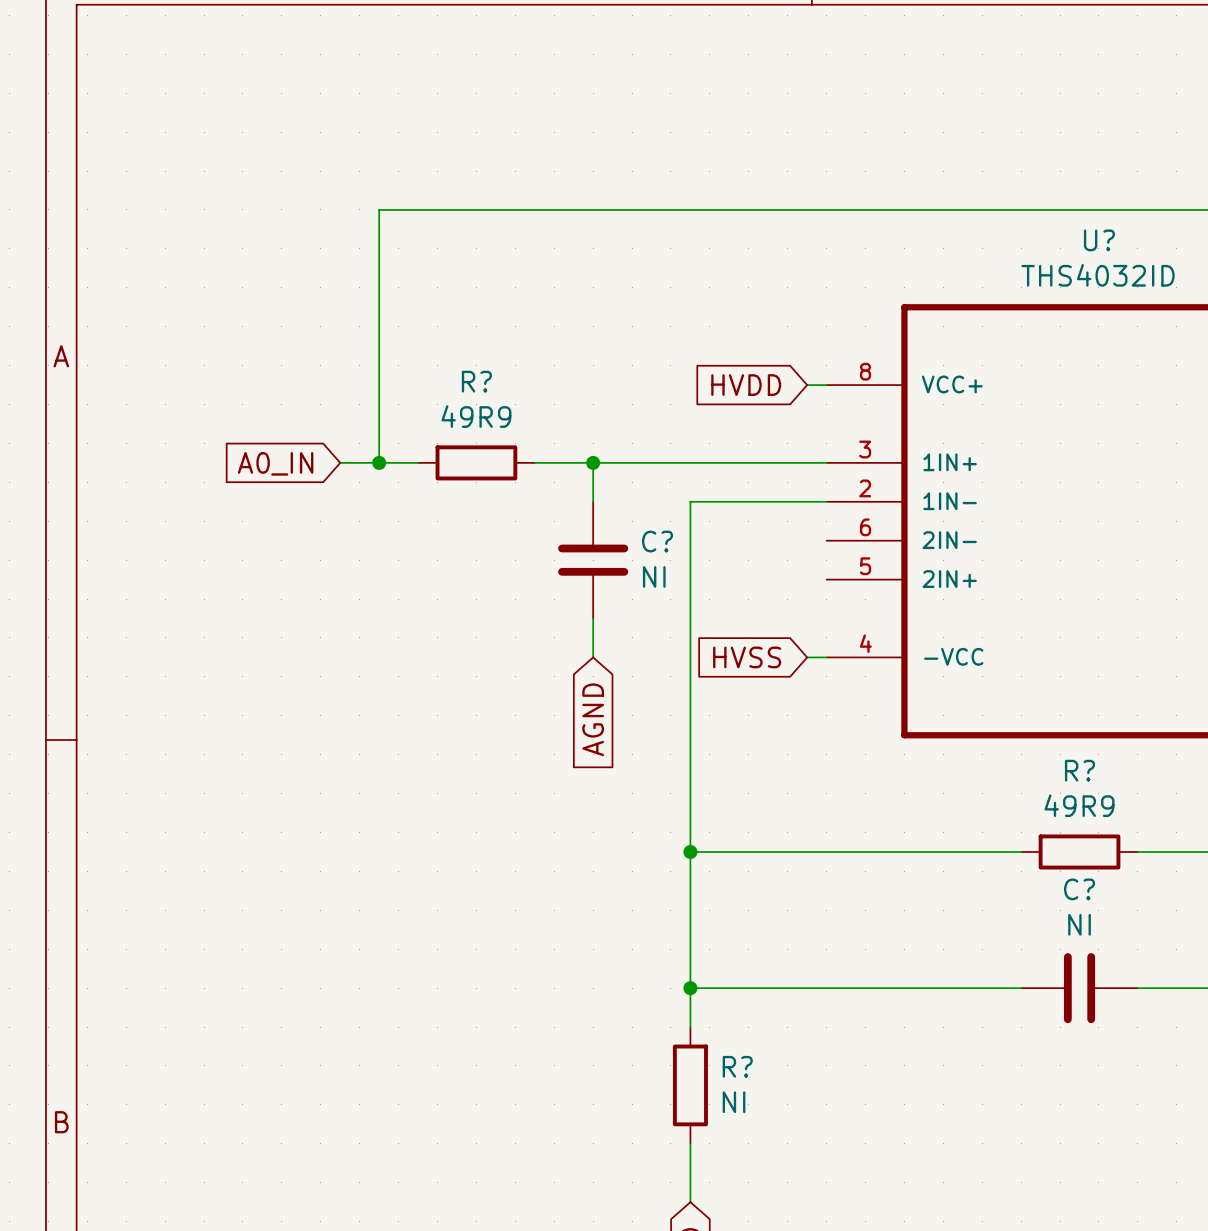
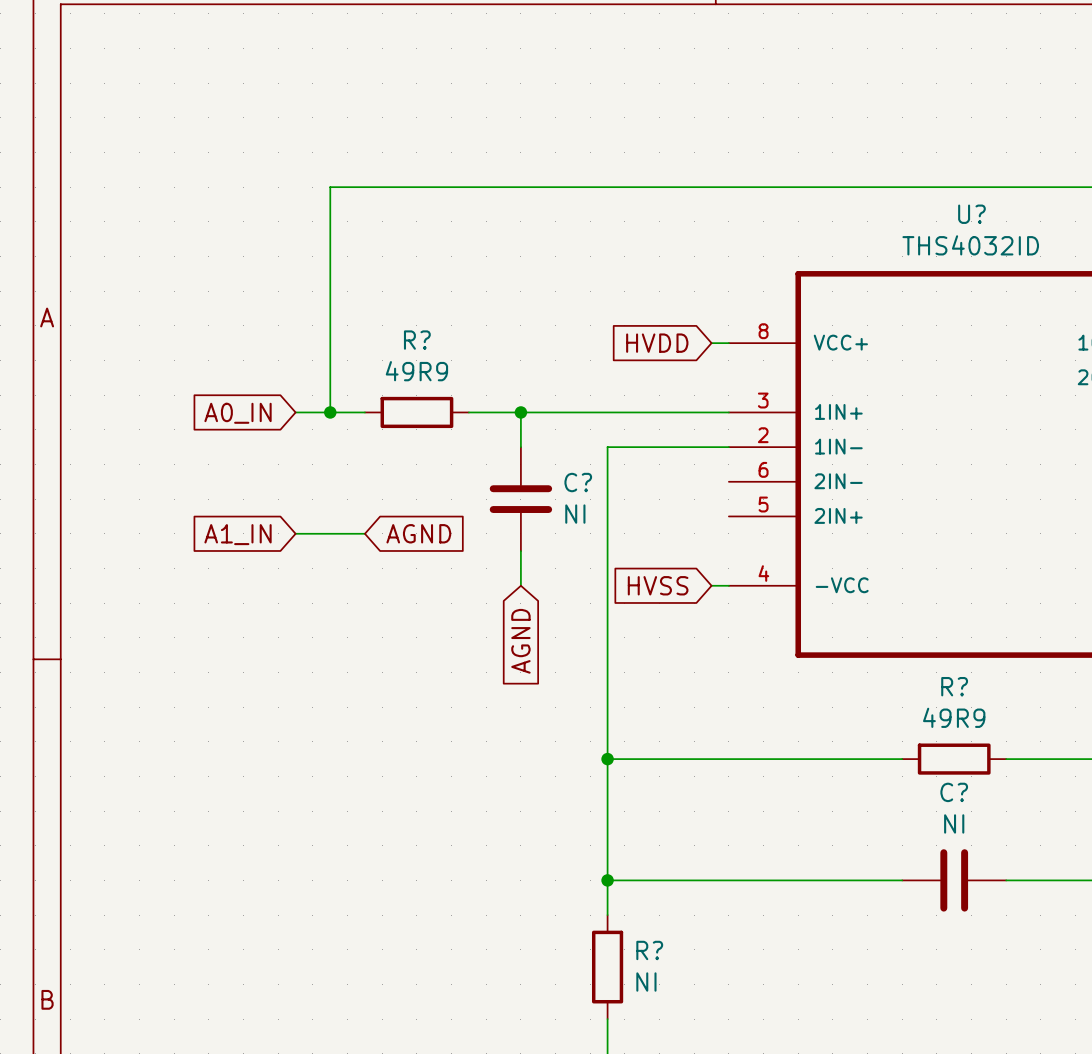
global label: none -> A1_IN (238, 534)
wire: none -> (295, 533) (364, 533)
global label: none -> AGND (418, 533)

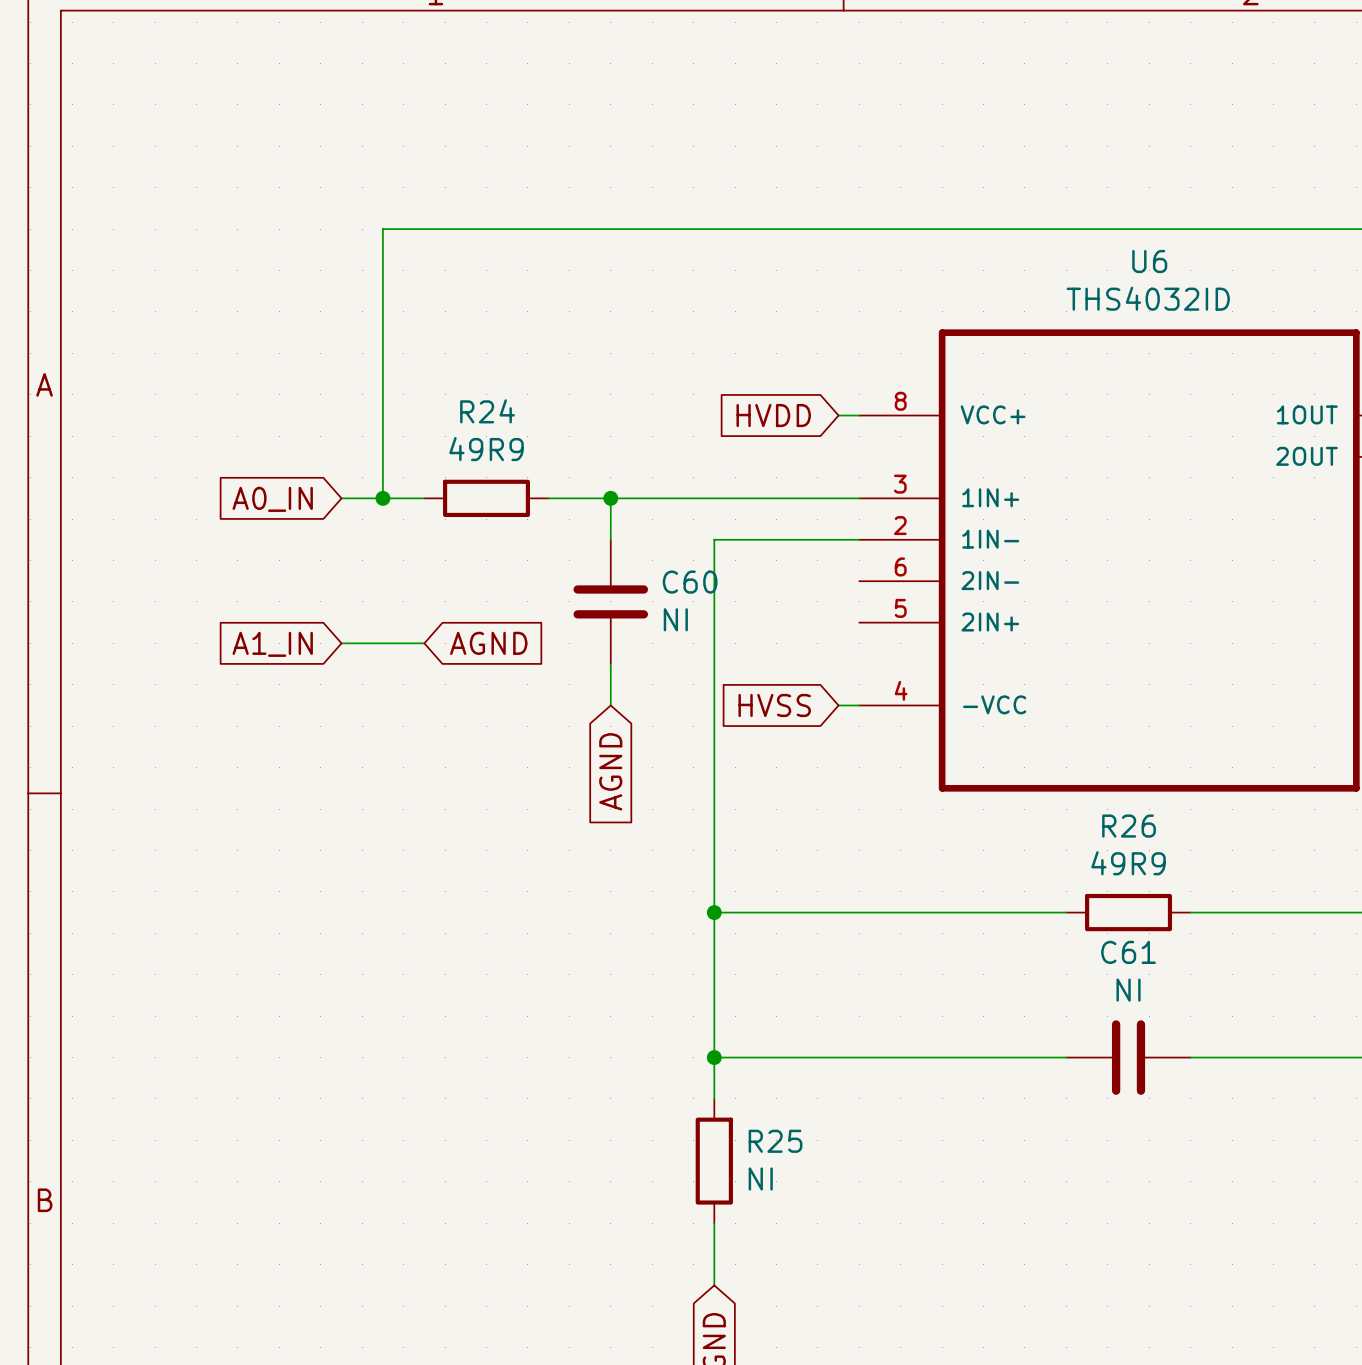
U? name: U? (971, 214) -> U6 (1149, 261)
R? name: R? (417, 340) -> R24 (487, 411)
C? name: C? (578, 482) -> C60 (690, 582)
R? name: R? (954, 686) -> R26 (1129, 826)
C? name: C? (954, 792) -> C61 (1128, 952)
R? name: R? (649, 950) -> R25 (775, 1141)

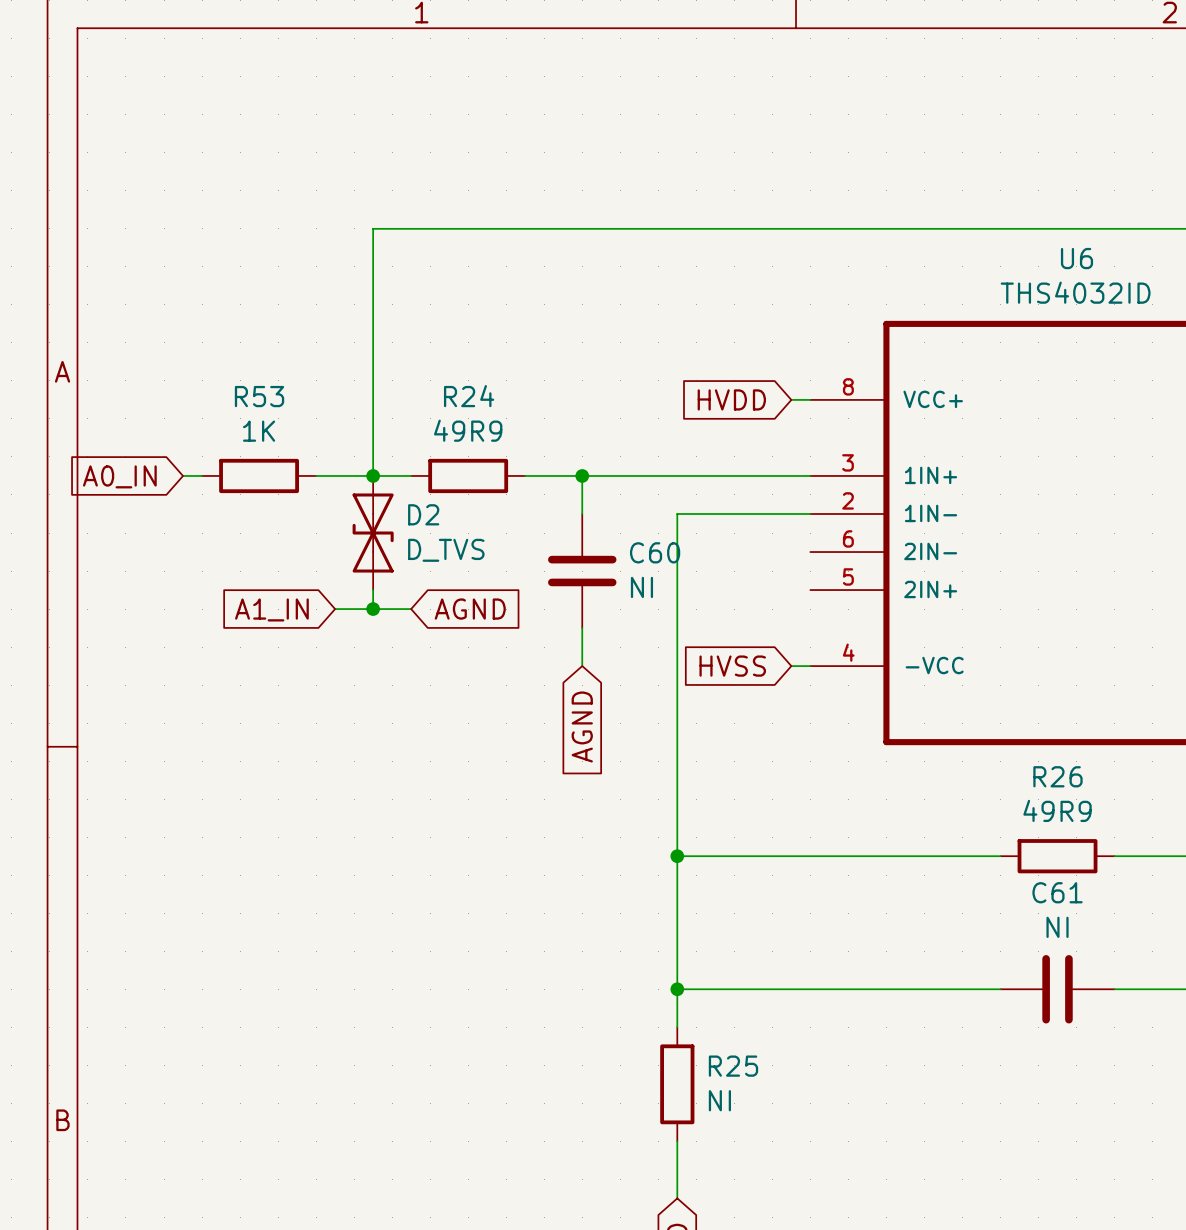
wire: none -> (183, 475) (202, 475)
R53: none -> 1K (259, 475)
wire: none -> (316, 475) (335, 475)
global label position: A0_IN (272, 499) -> A0_IN (119, 476)
D2: none -> D_TVS (373, 533)
wire: none -> (373, 590) (373, 609)
junction: none -> (373, 609)

